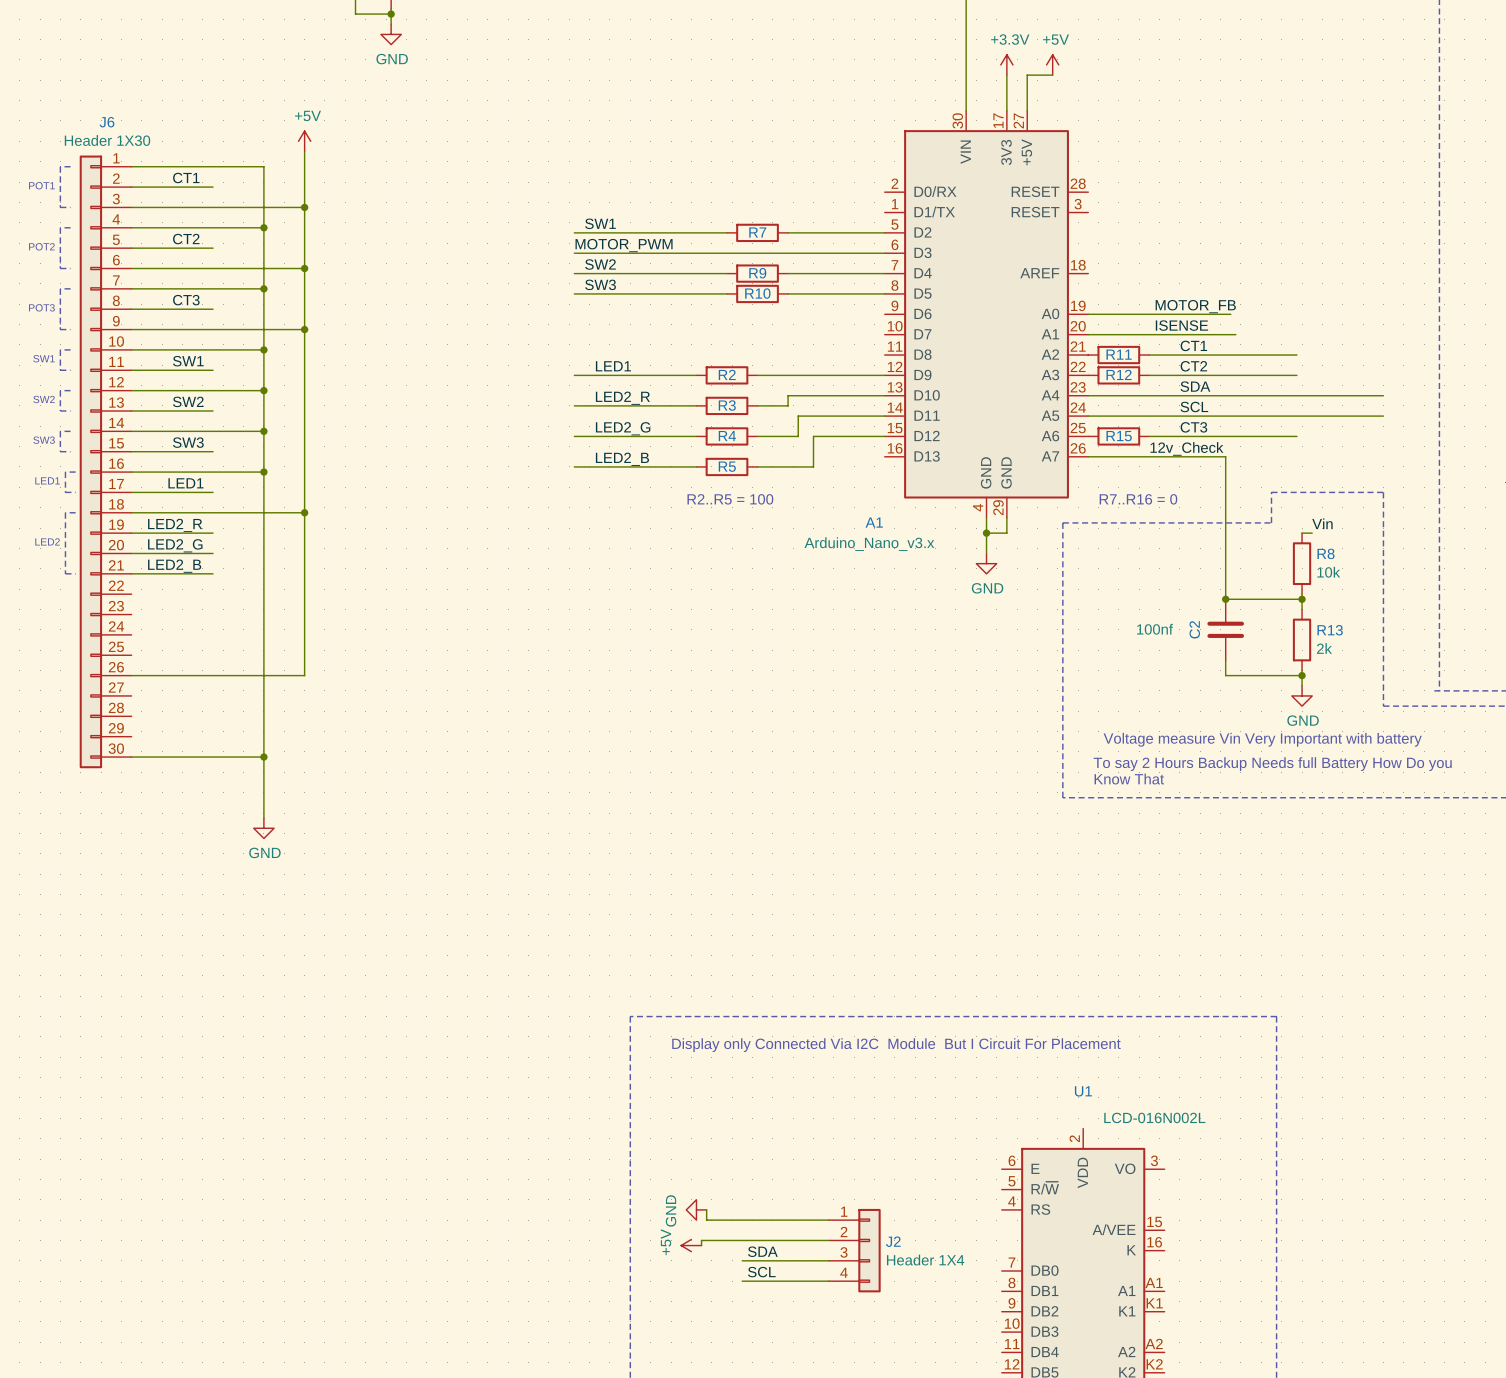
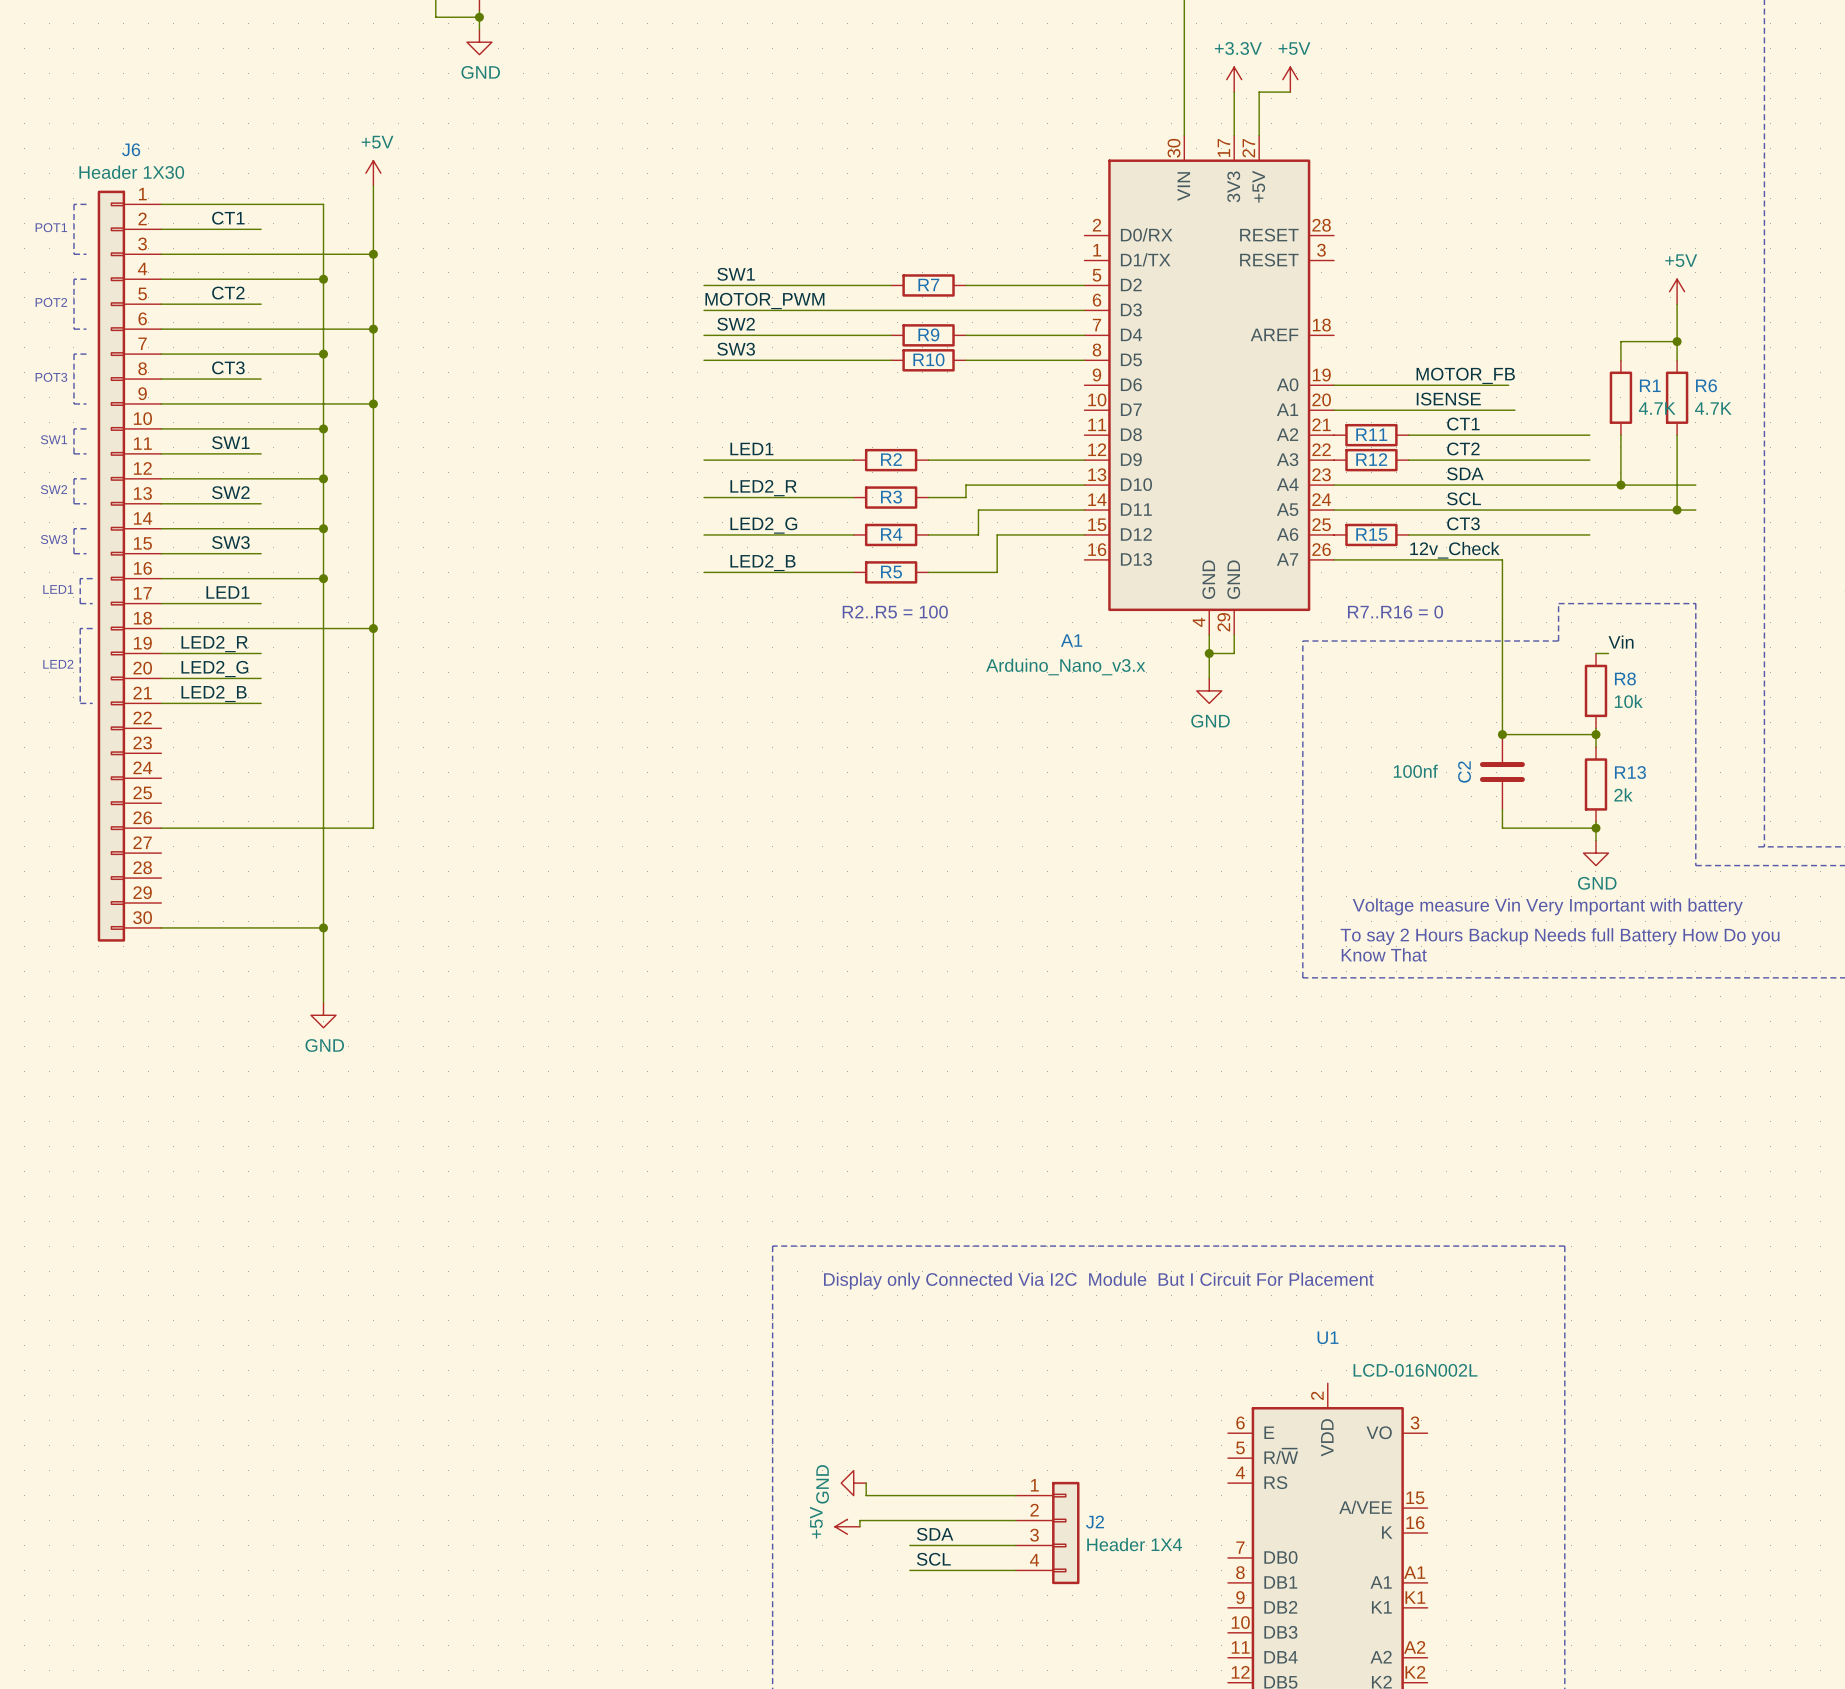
power symbol: none -> +5V (1677, 291)
wire: none -> (1677, 304) (1677, 360)
wire: none -> (1677, 341) (1620, 341) (1620, 360)
junction: none -> (1677, 341)
R1: none -> 4.7K (1620, 397)
R6: none -> 4.7K (1677, 397)
wire: none -> (1620, 435) (1620, 485)
wire: none -> (1677, 435) (1677, 510)
junction: none -> (1620, 485)
junction: none -> (1677, 510)

